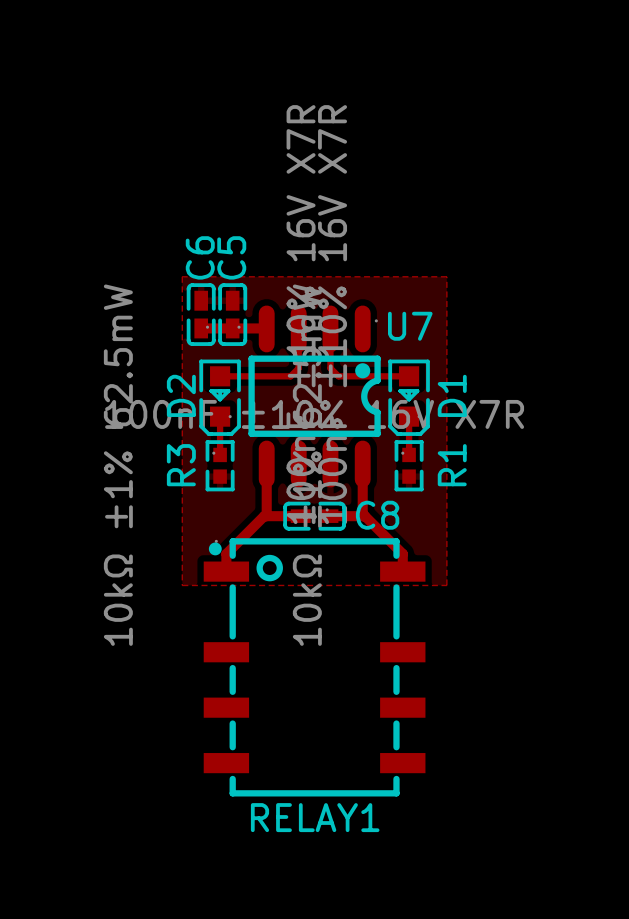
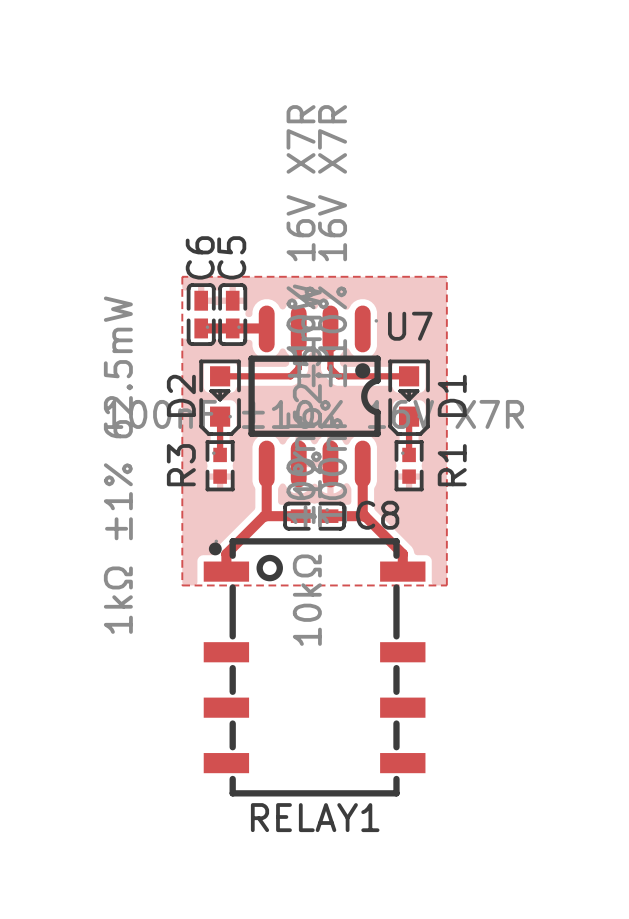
R3 value: 10kΩ ±1% 62.5mW (118, 465) -> 1kΩ ±1% 62.5mW (118, 465)

